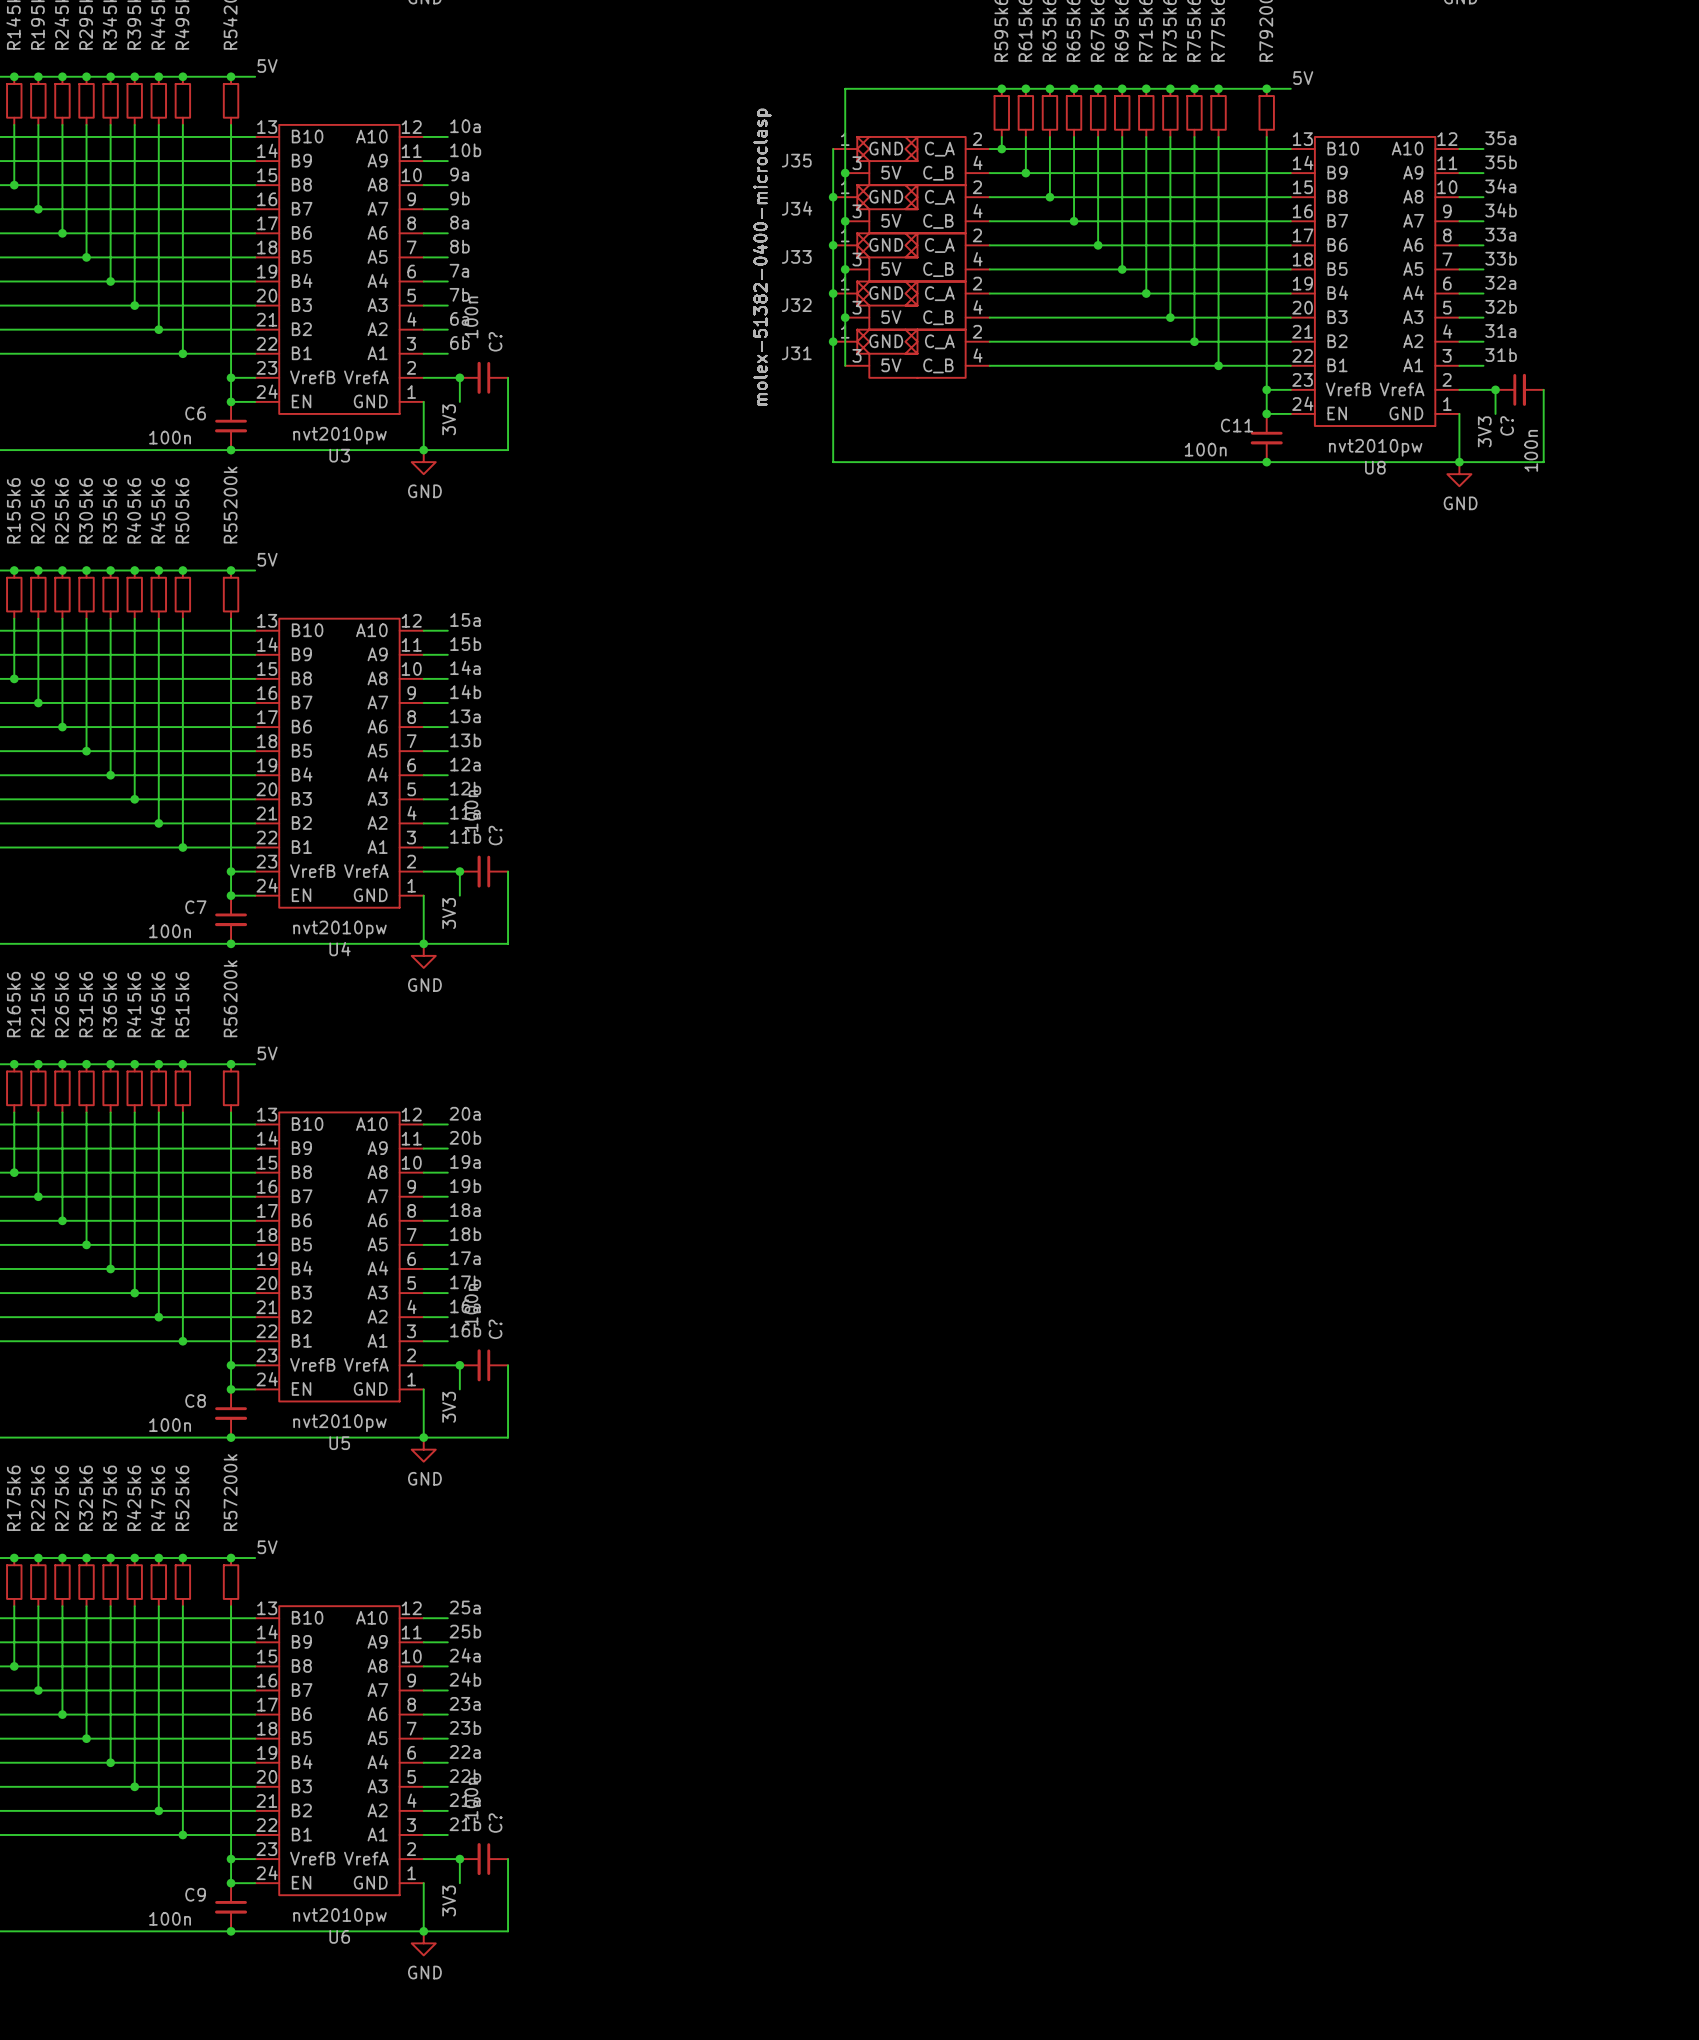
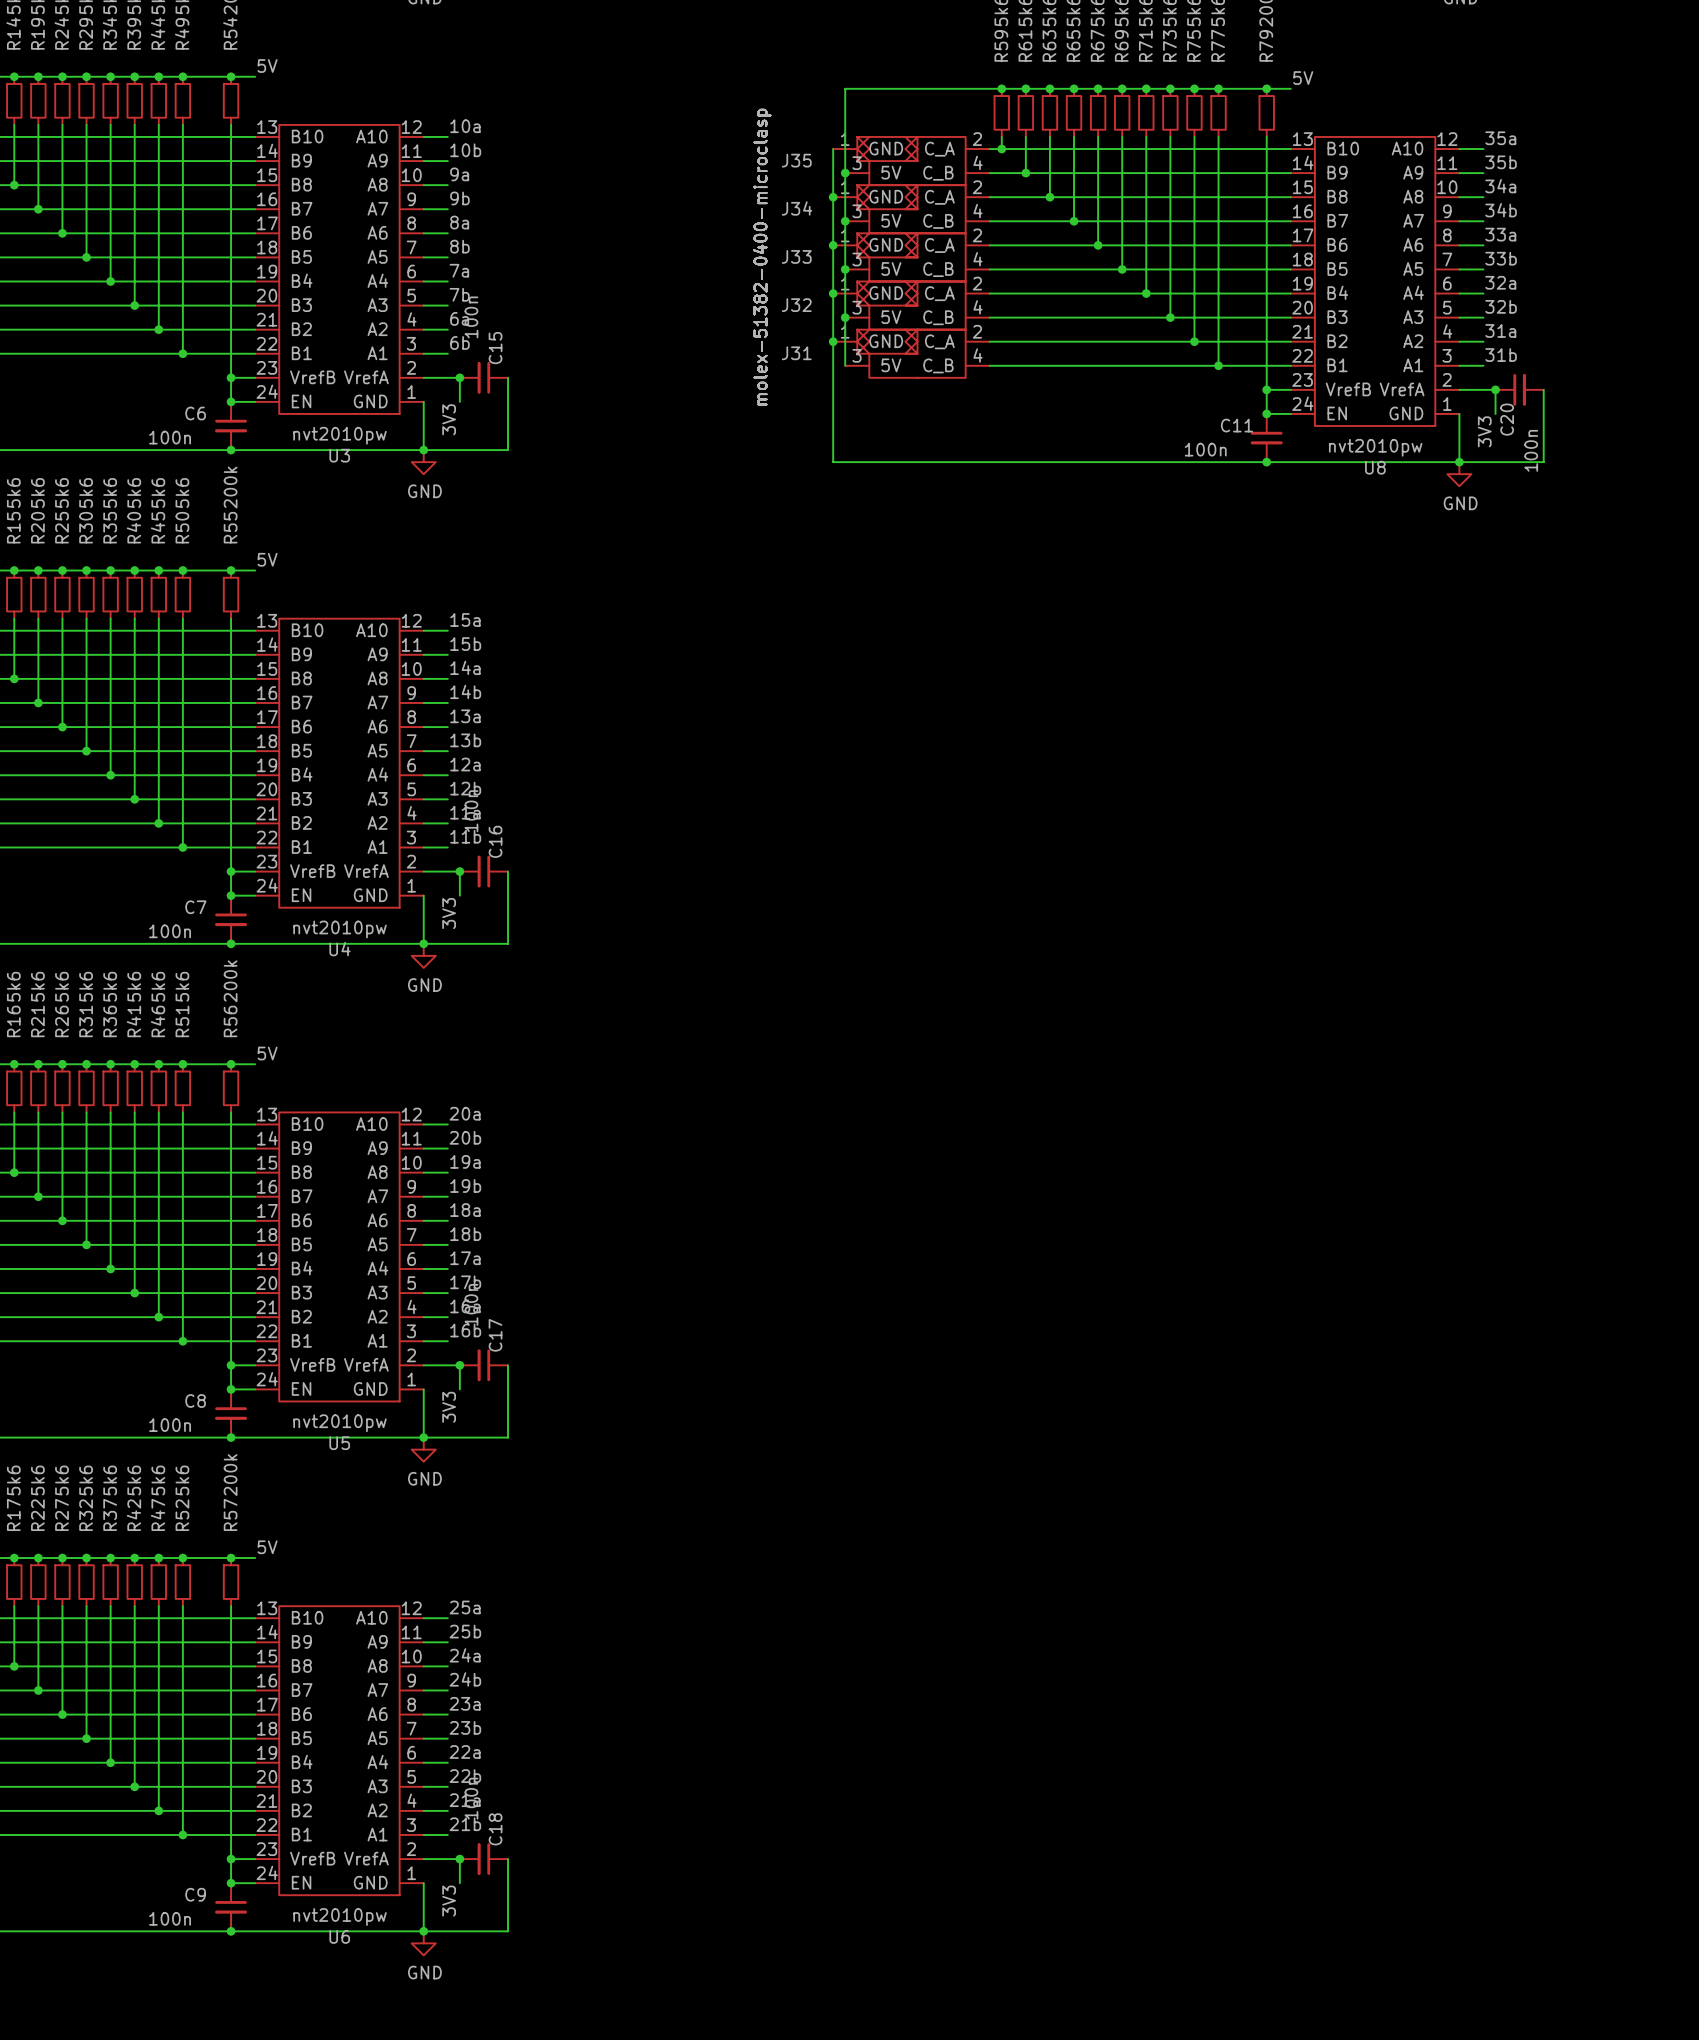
C? name: C? (495, 341) -> C15 (495, 348)
C? name: C? (1507, 425) -> C20 (1507, 419)
C? name: C? (495, 835) -> C16 (495, 841)
C? name: C? (495, 1329) -> C17 (495, 1335)
C? name: C? (495, 1823) -> C18 (495, 1829)

